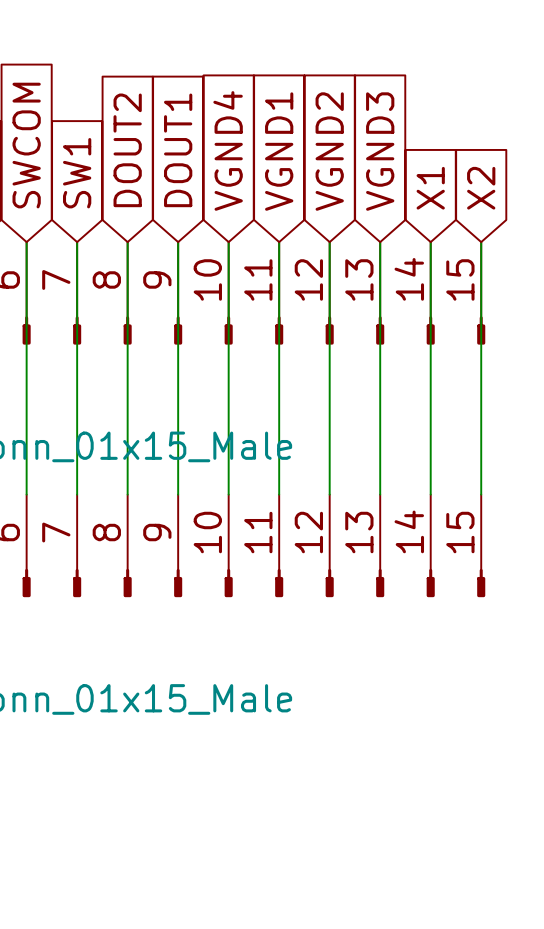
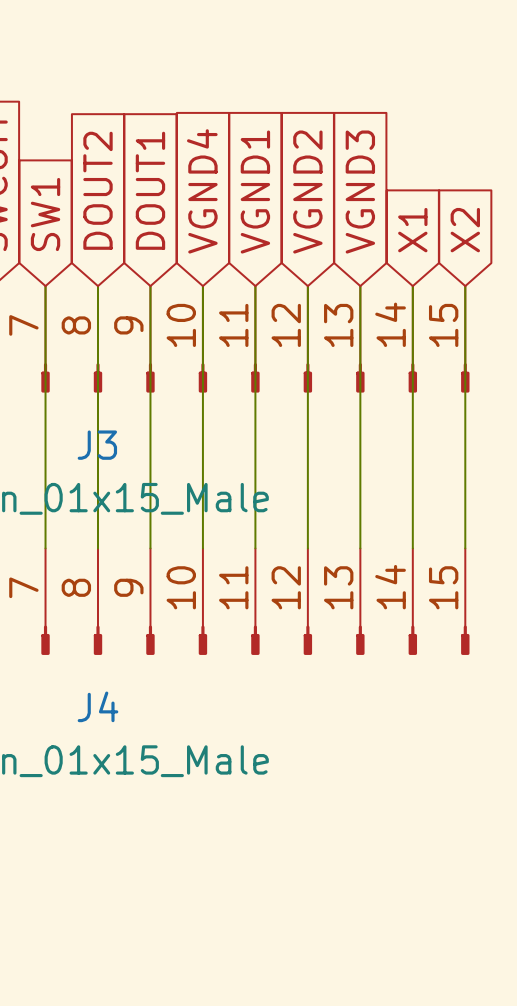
J3 name: none -> J3 (97, 445)
J4 name: none -> J4 (97, 706)

